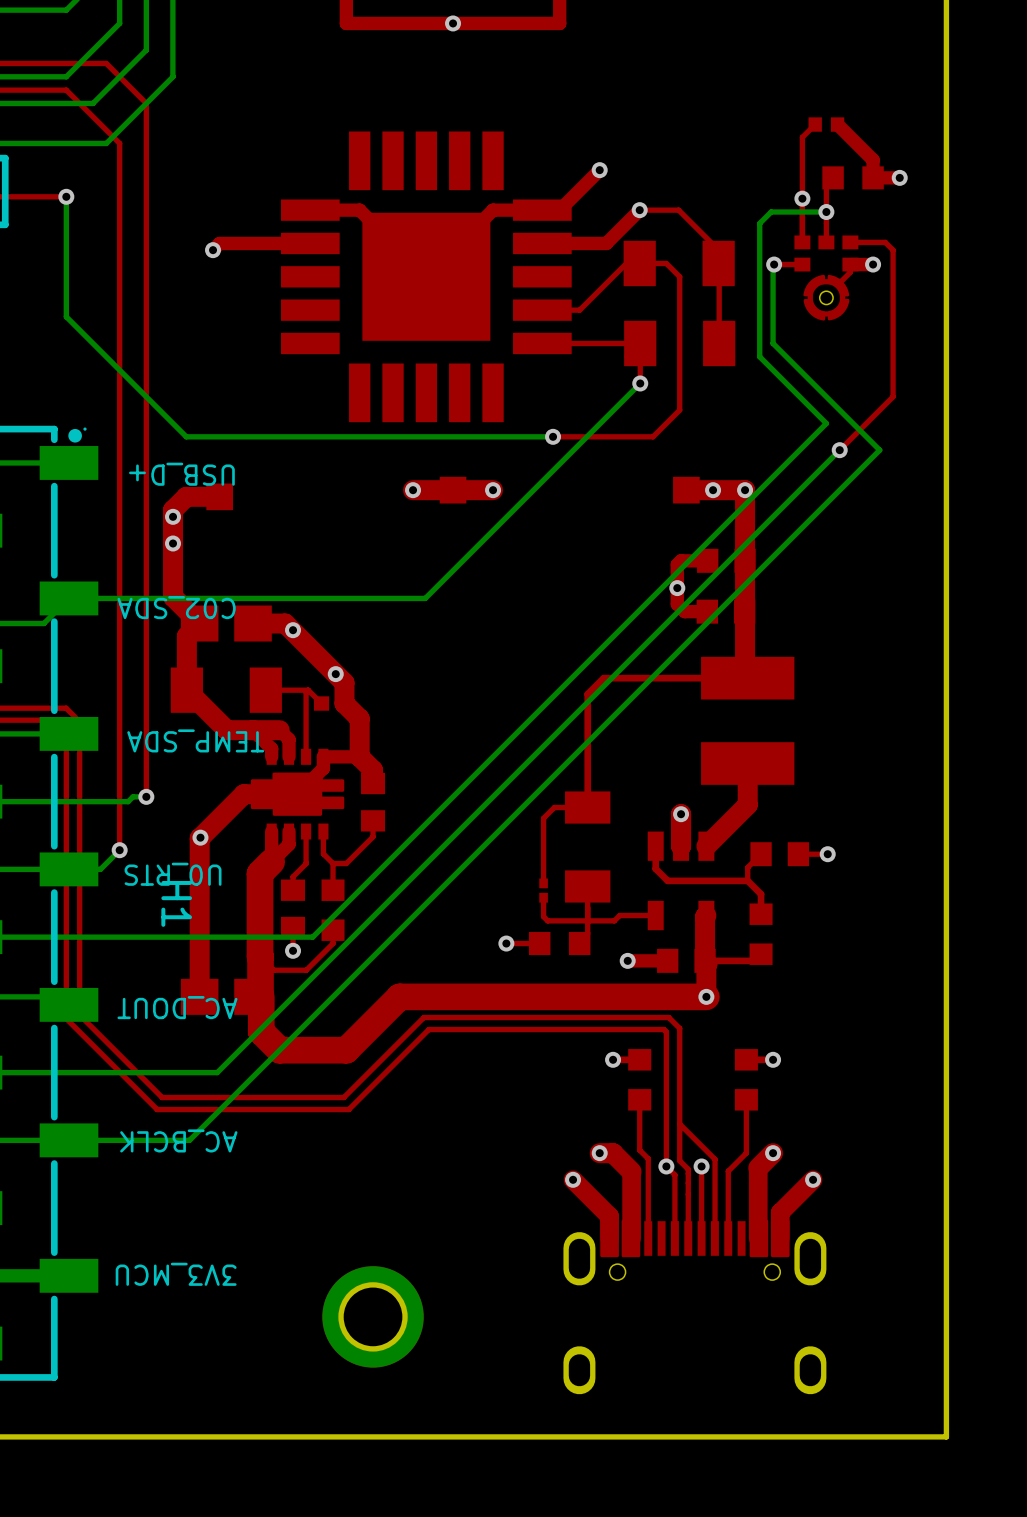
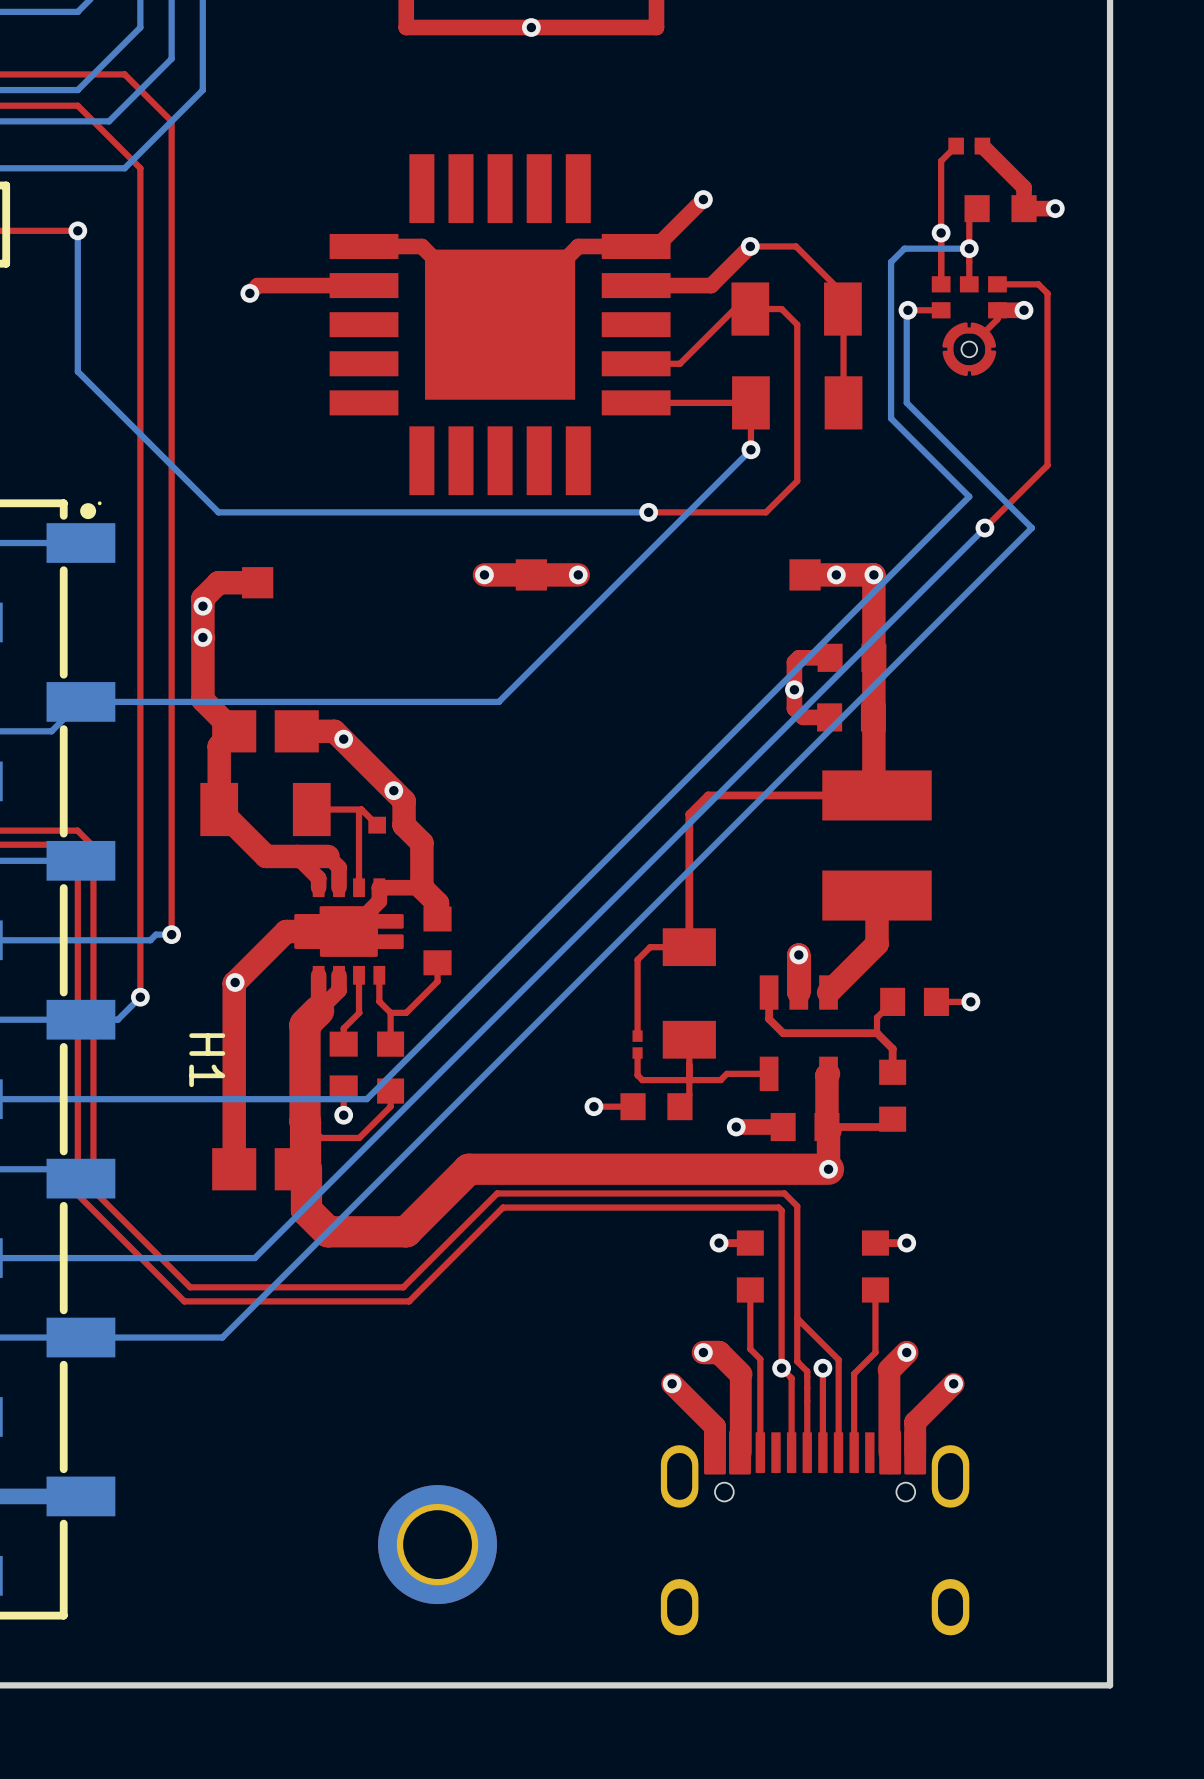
text: USB_D+ (181, 474) -> none
text: C02_SDA (176, 607) -> none
text: TEMP_SDA (195, 740) -> none
text: U0_RTS (173, 874) -> none
text: AC_DOUT (177, 1007) -> none
text: AC_BCLK (178, 1140) -> none
text: 3V3_MCU (176, 1274) -> none

